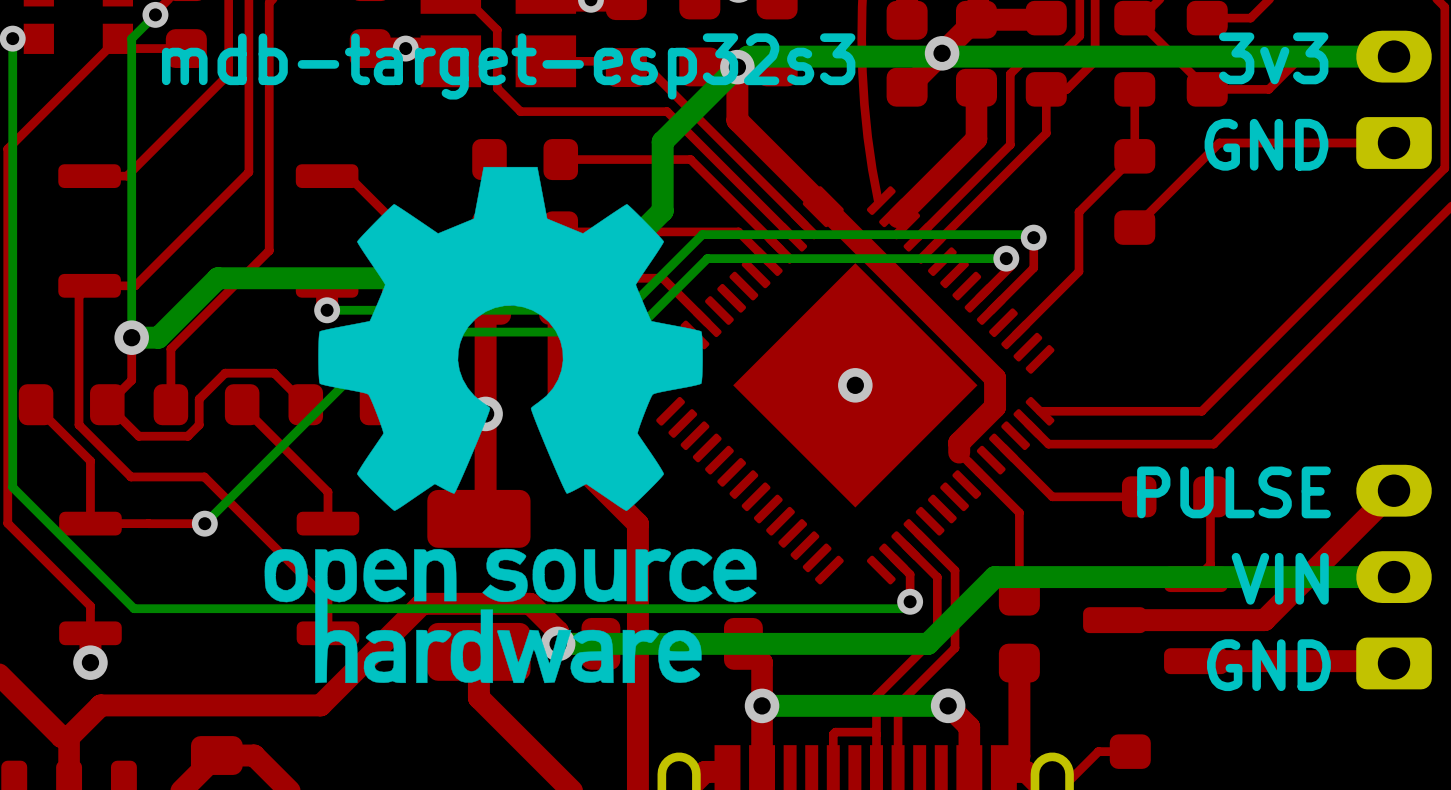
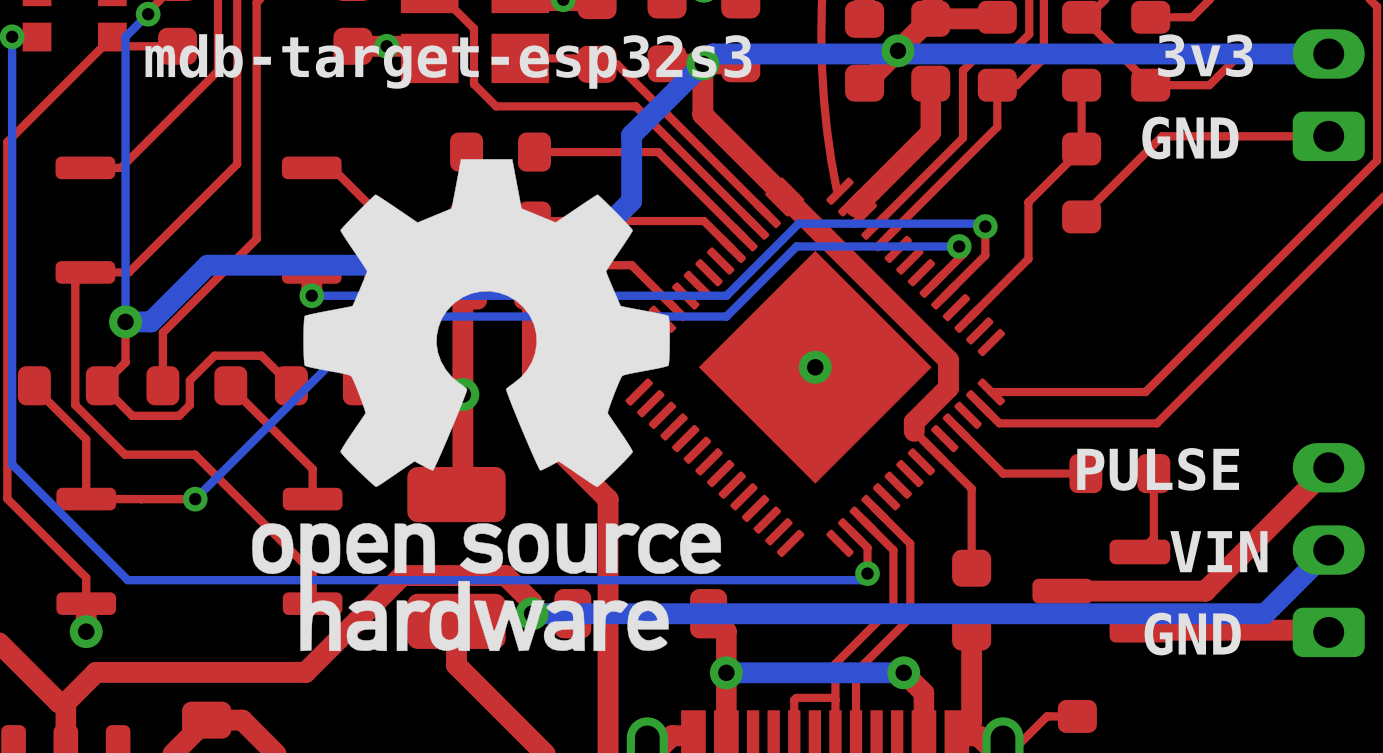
bottom track: (837, 234) (702, 234) (626, 310) -> (798, 223) (726, 295) (597, 295)
bottom track: (835, 258) (707, 258) (633, 332) -> (796, 246) (726, 316) (604, 316)
bottom track: (1394, 577) (994, 577) (928, 643) -> (1328, 550) (1265, 613) (884, 613)

